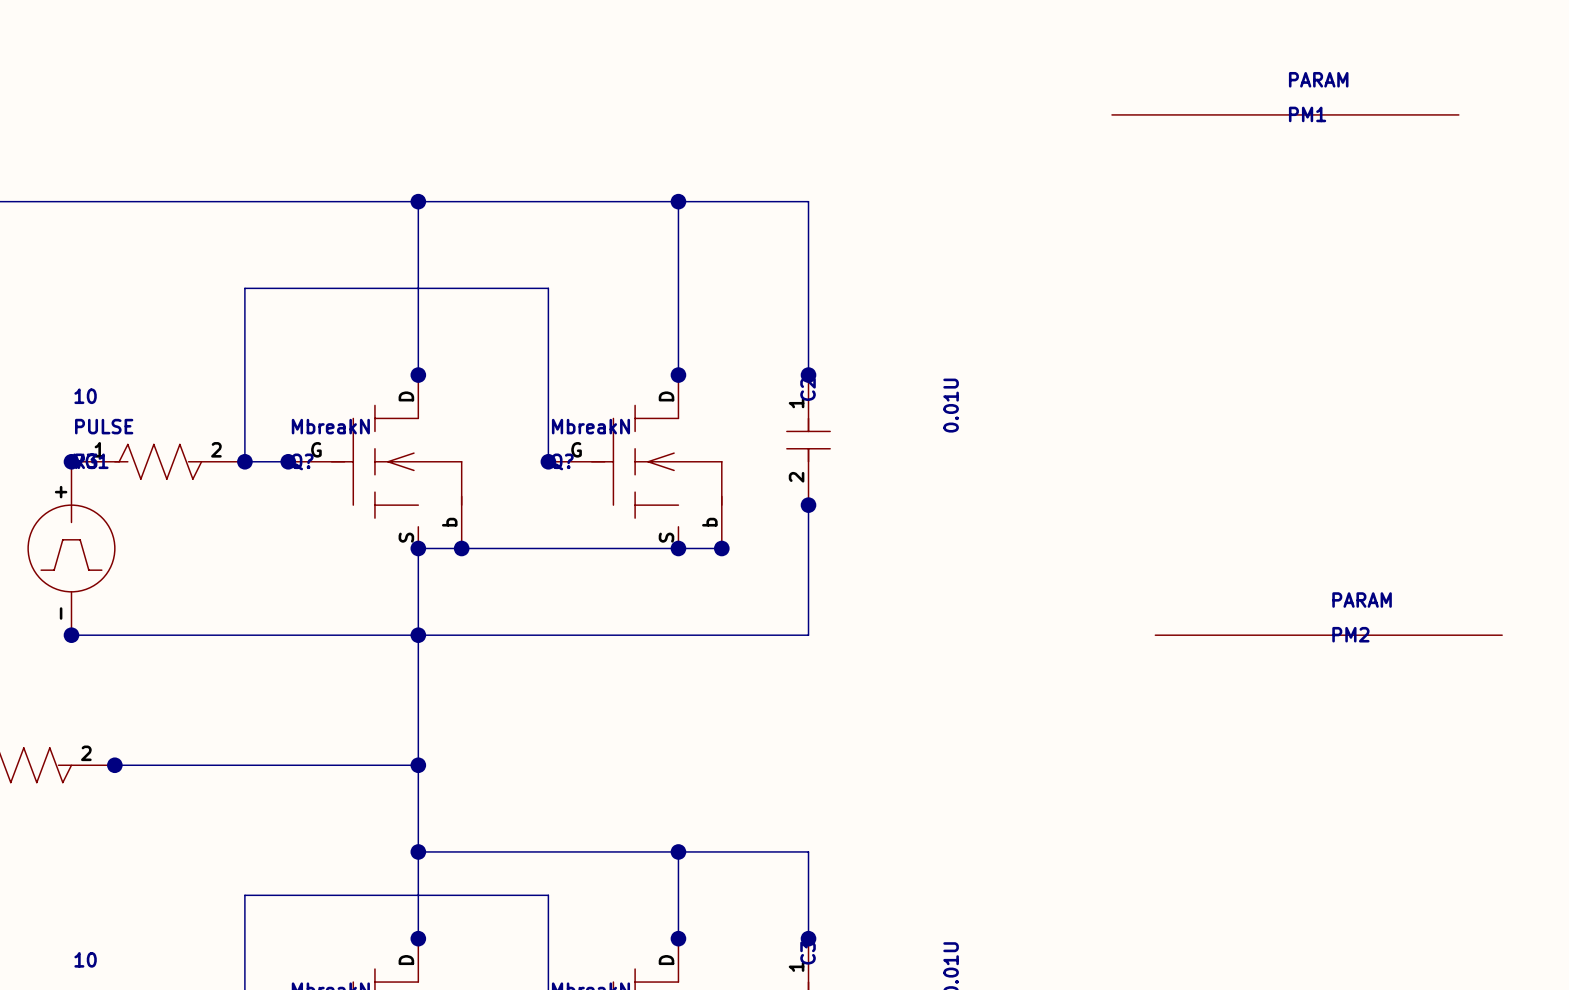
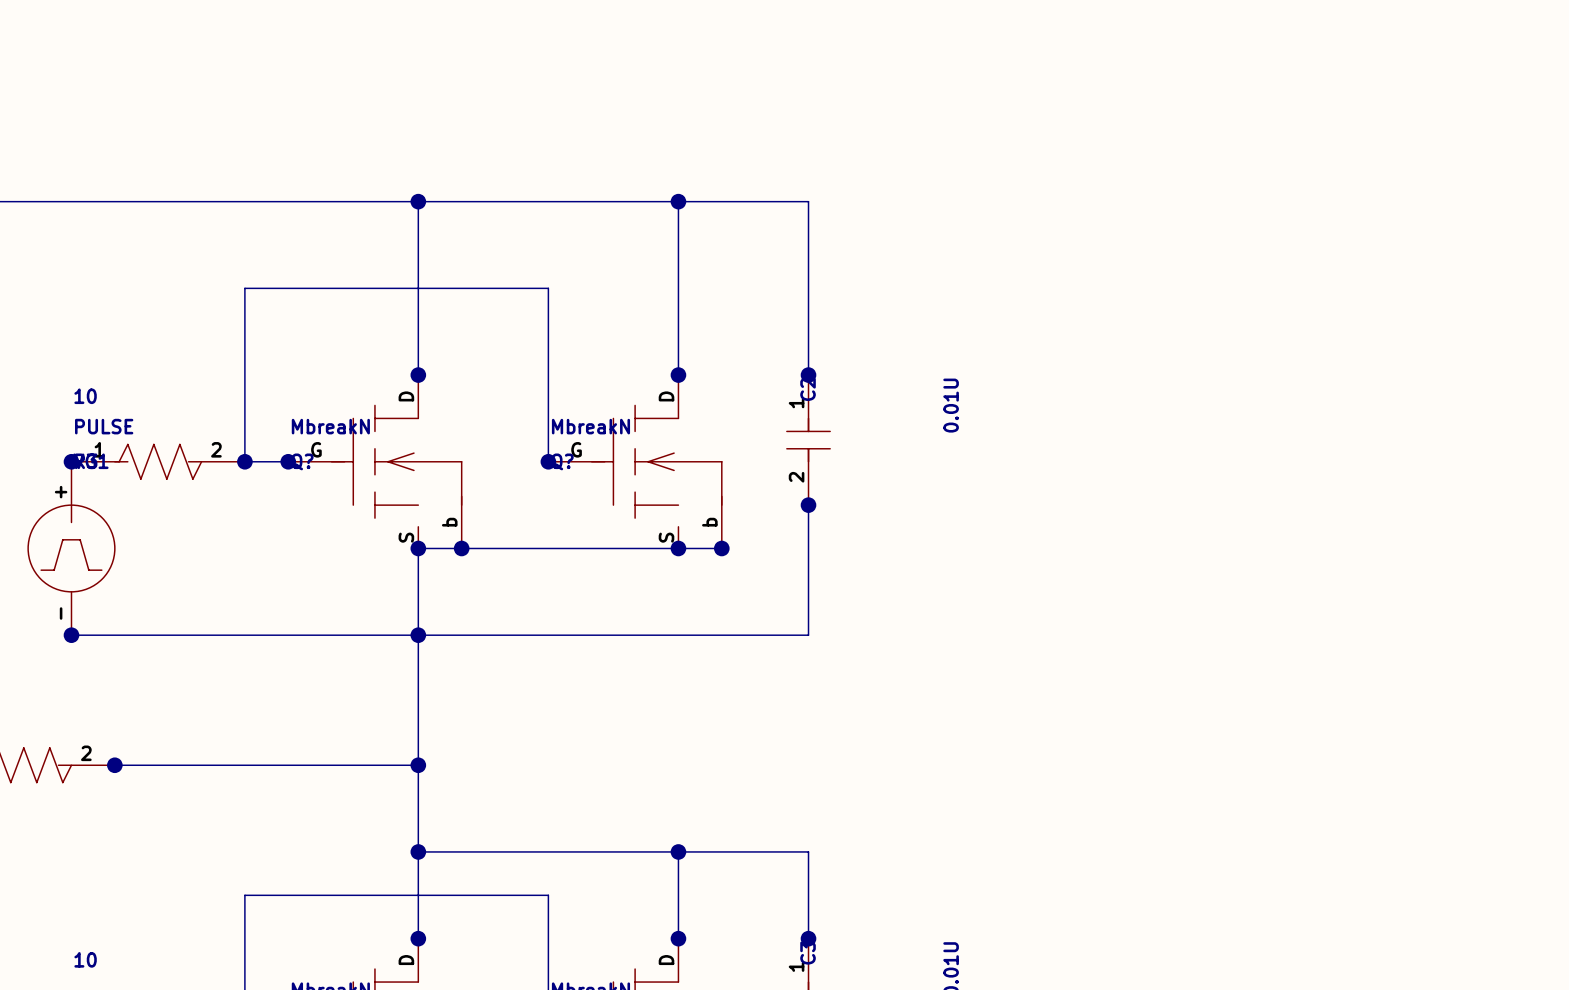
PM1: PARAM (1285, 114) -> none
PM2: PARAM (1328, 635) -> none

